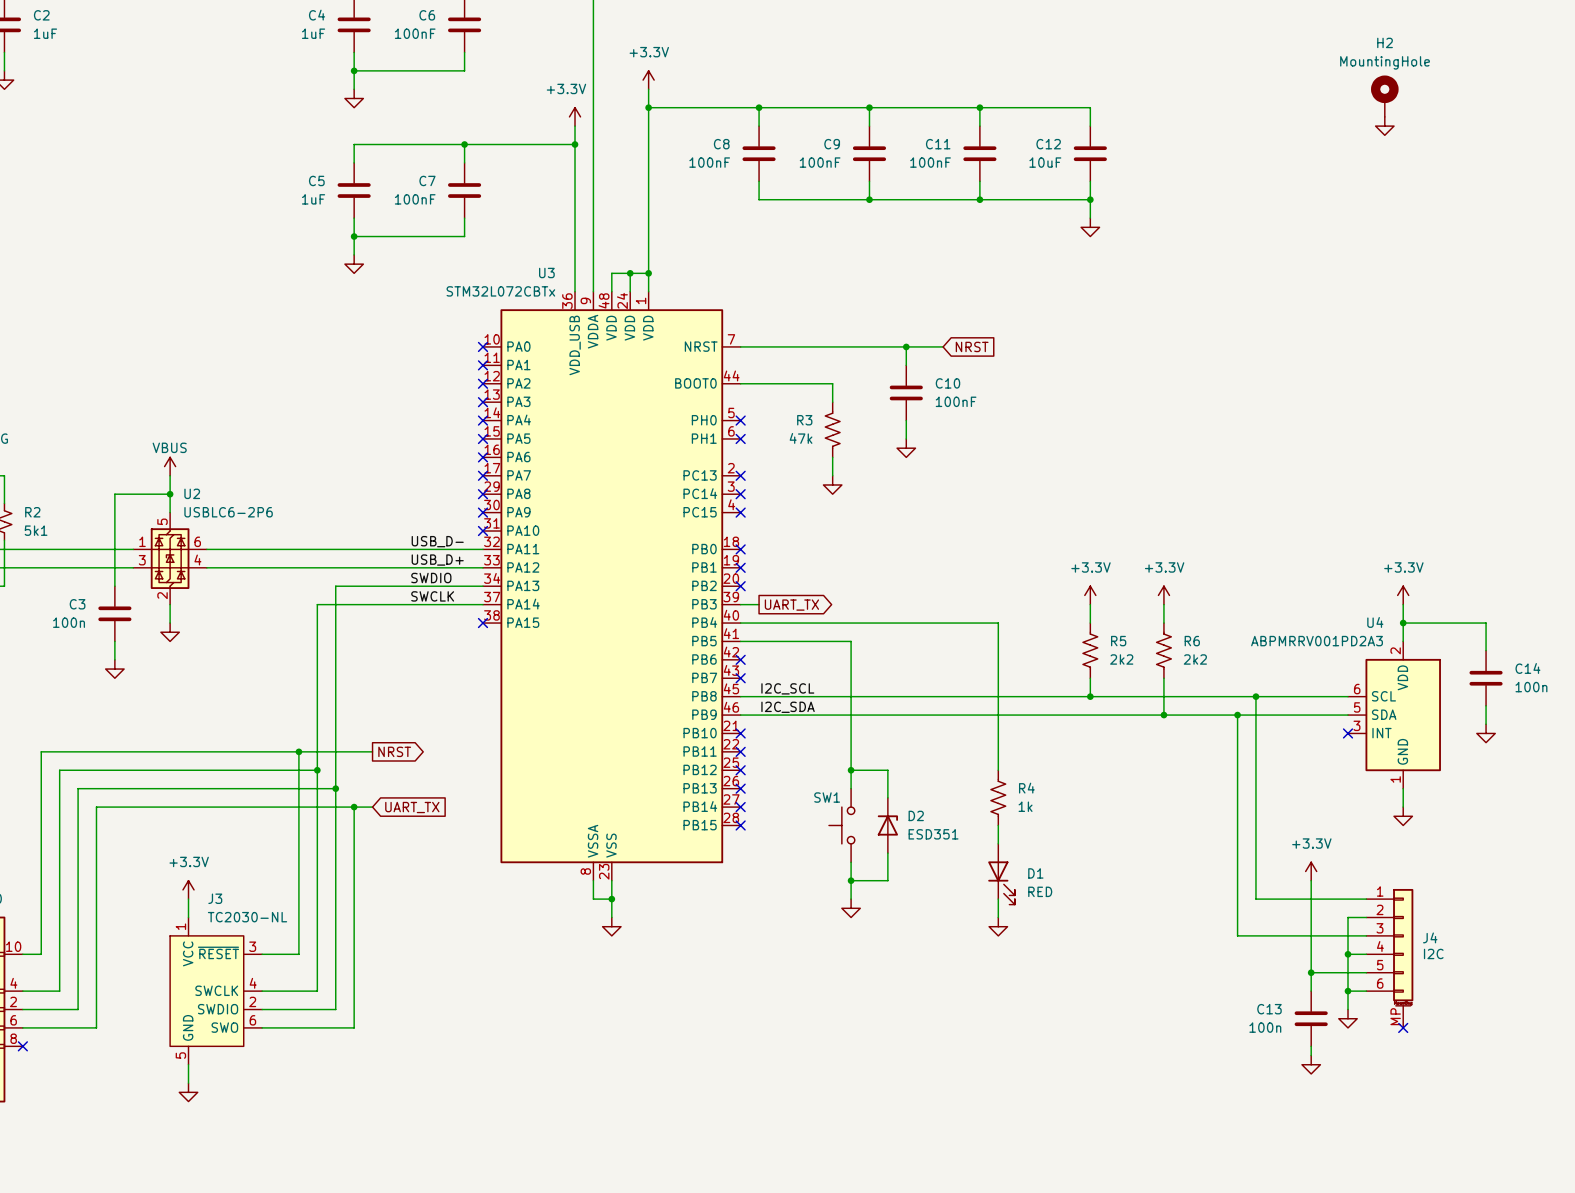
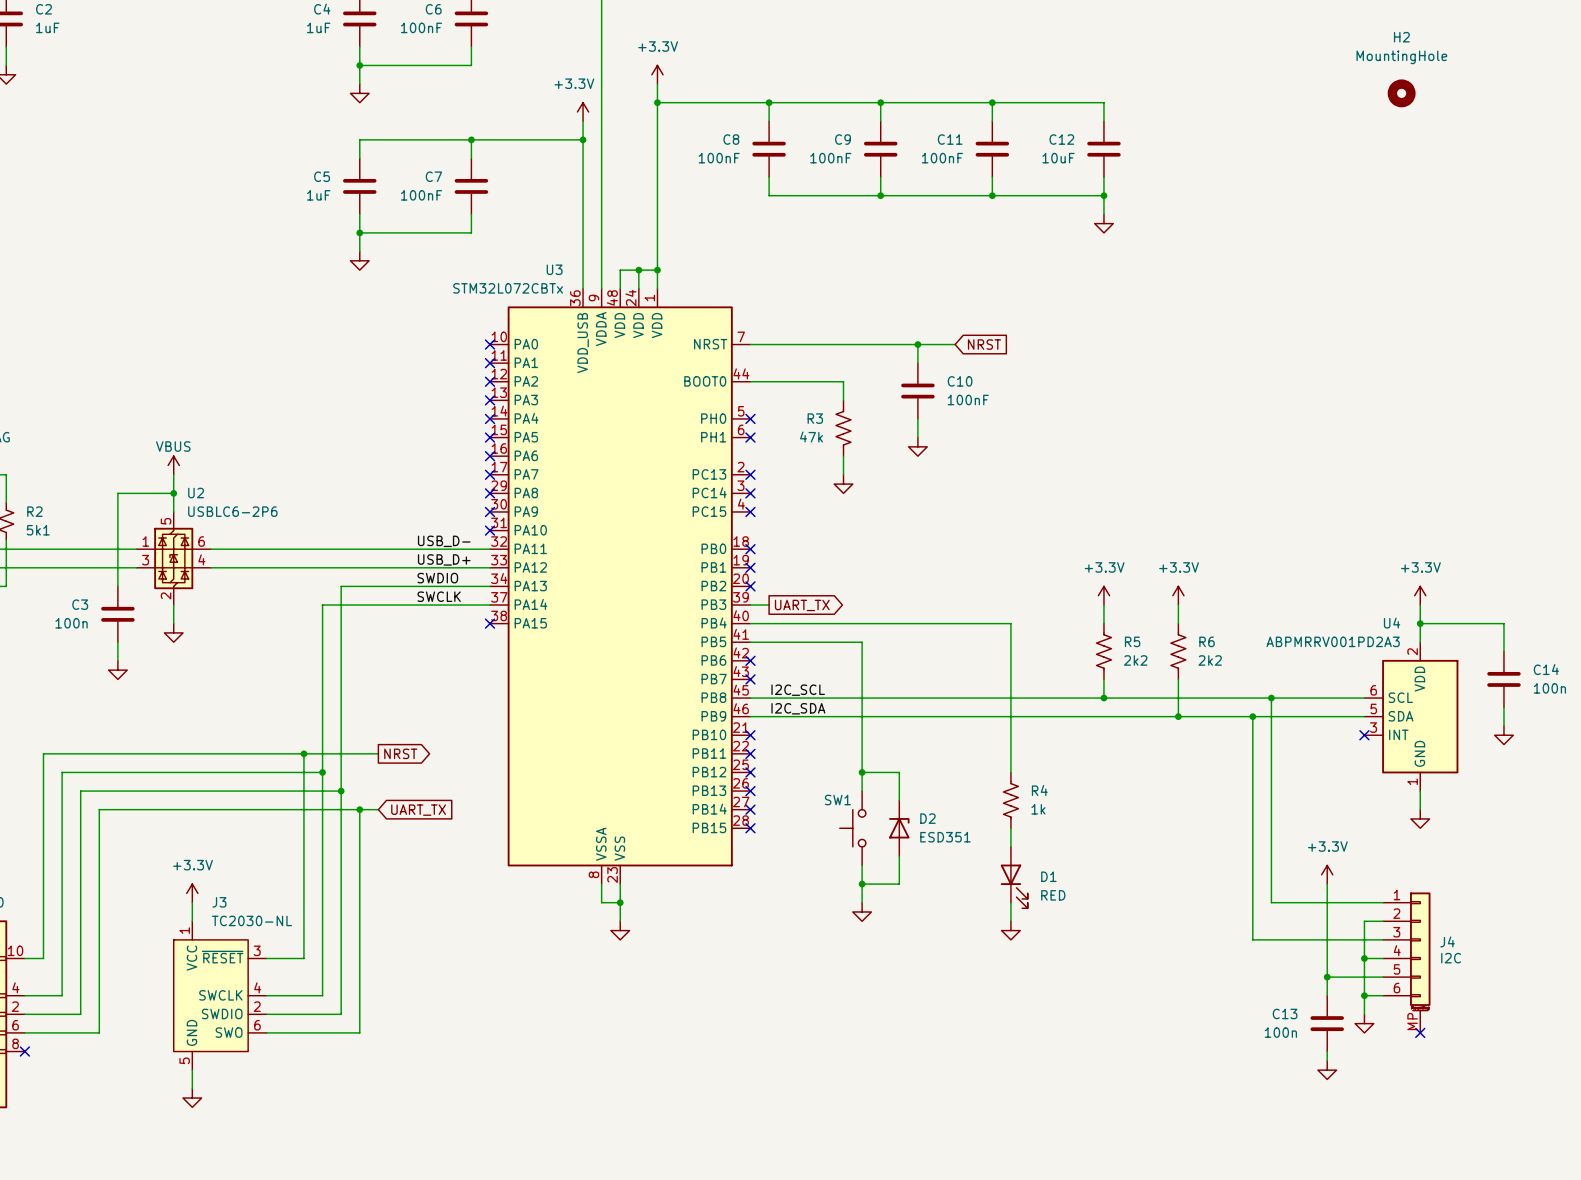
H2 symbol: [1371, 75, 1399, 117] -> [1387, 79, 1416, 108]
power symbol: (1384, 126) -> none

